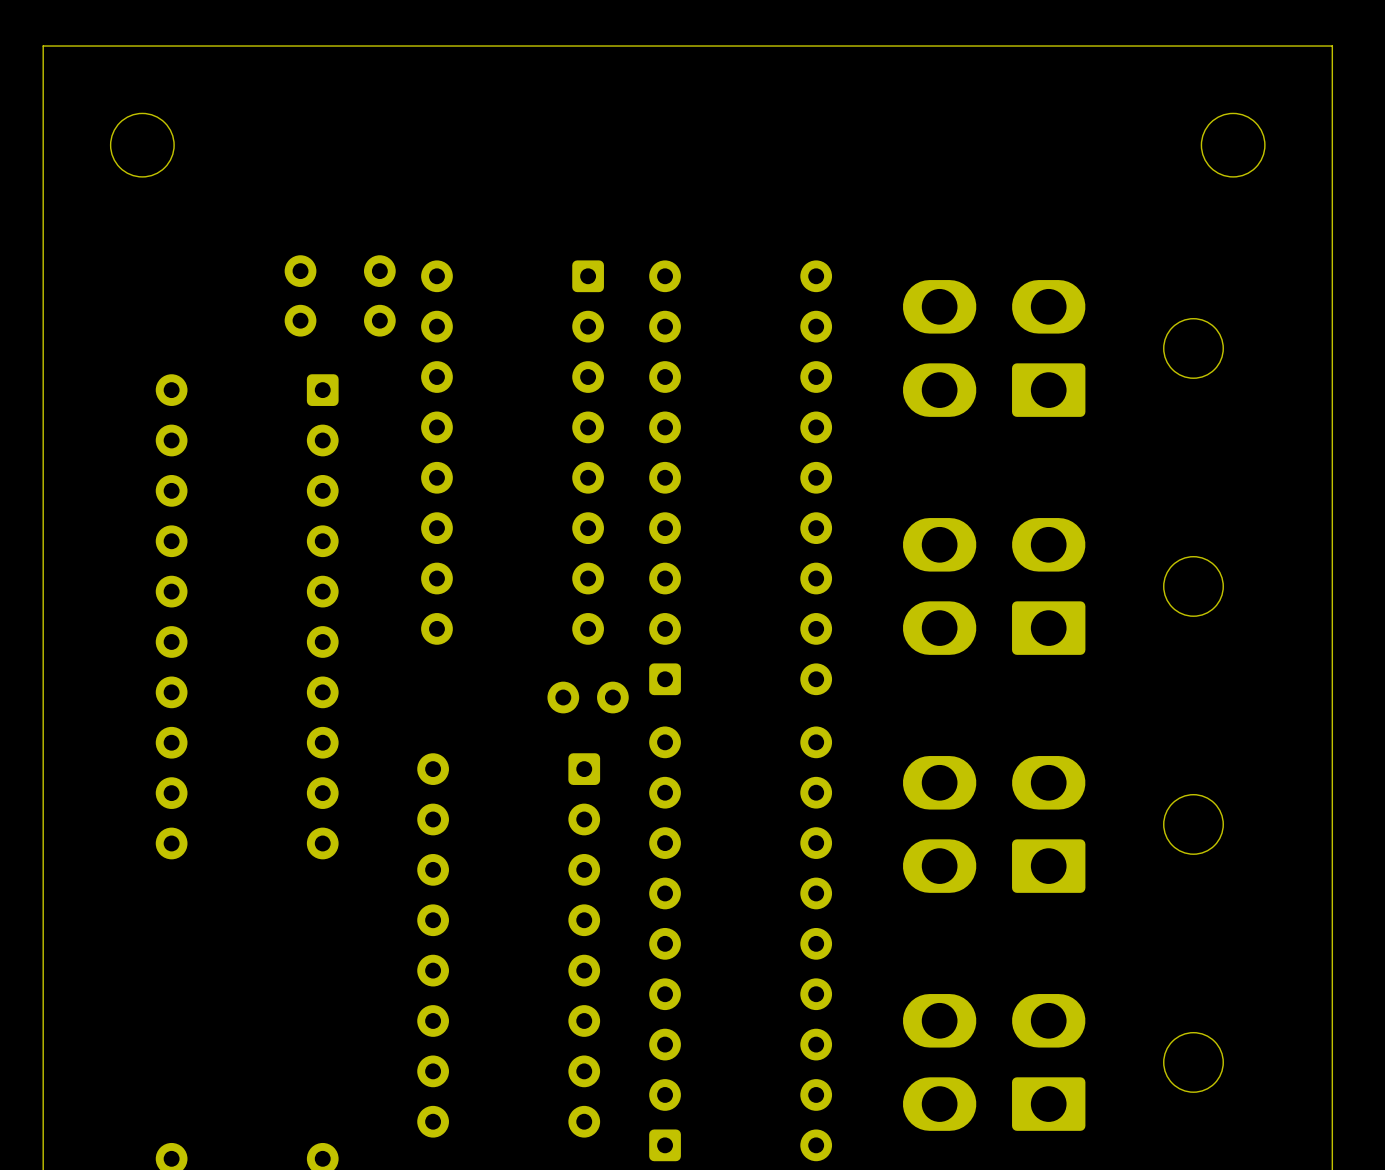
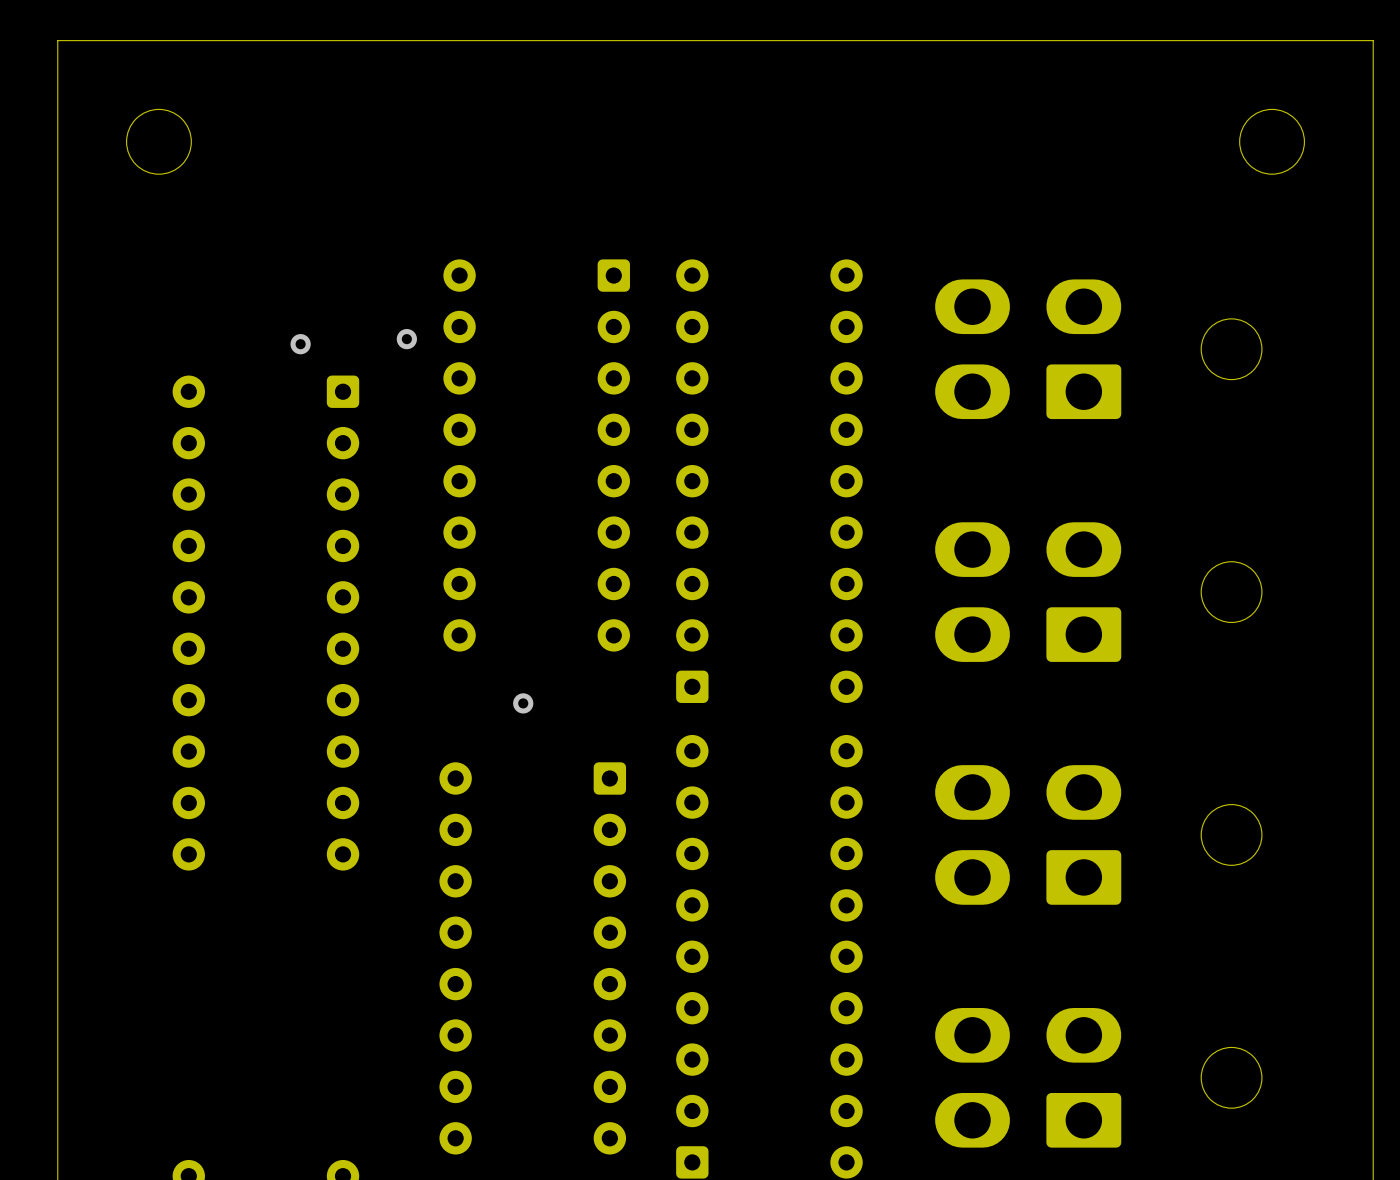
part: (300, 295) -> none
part: (379, 295) -> none
via: none -> (406, 339)
via: none -> (300, 344)
via: none -> (523, 703)
part: (588, 697) -> none

